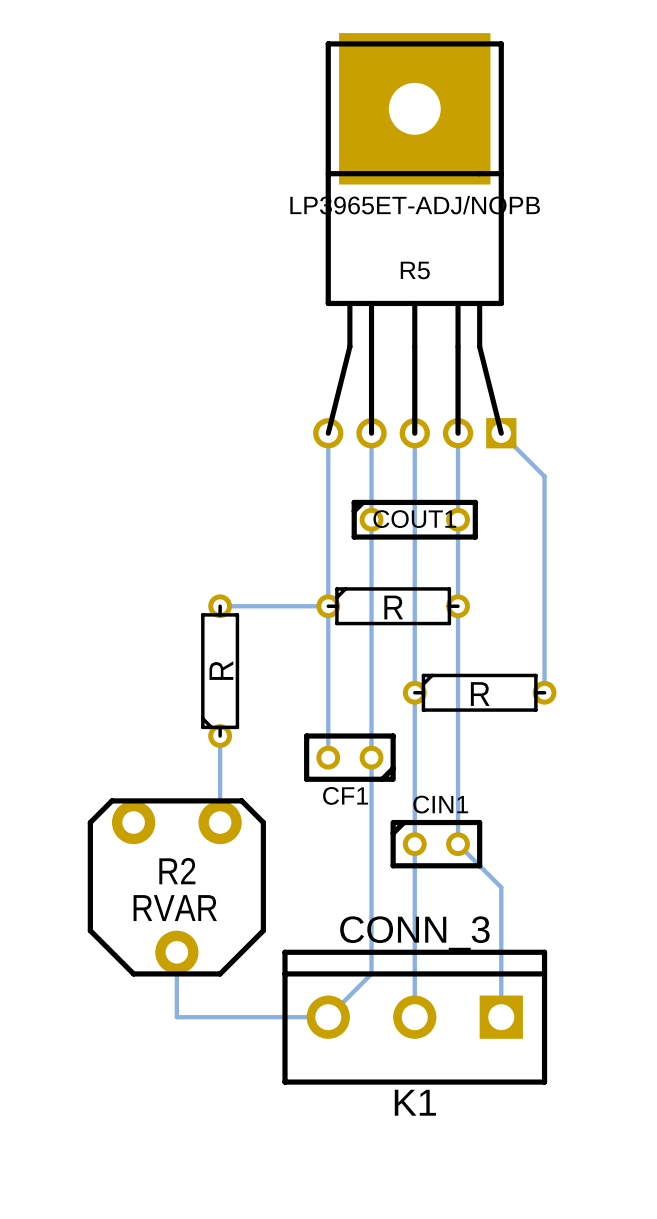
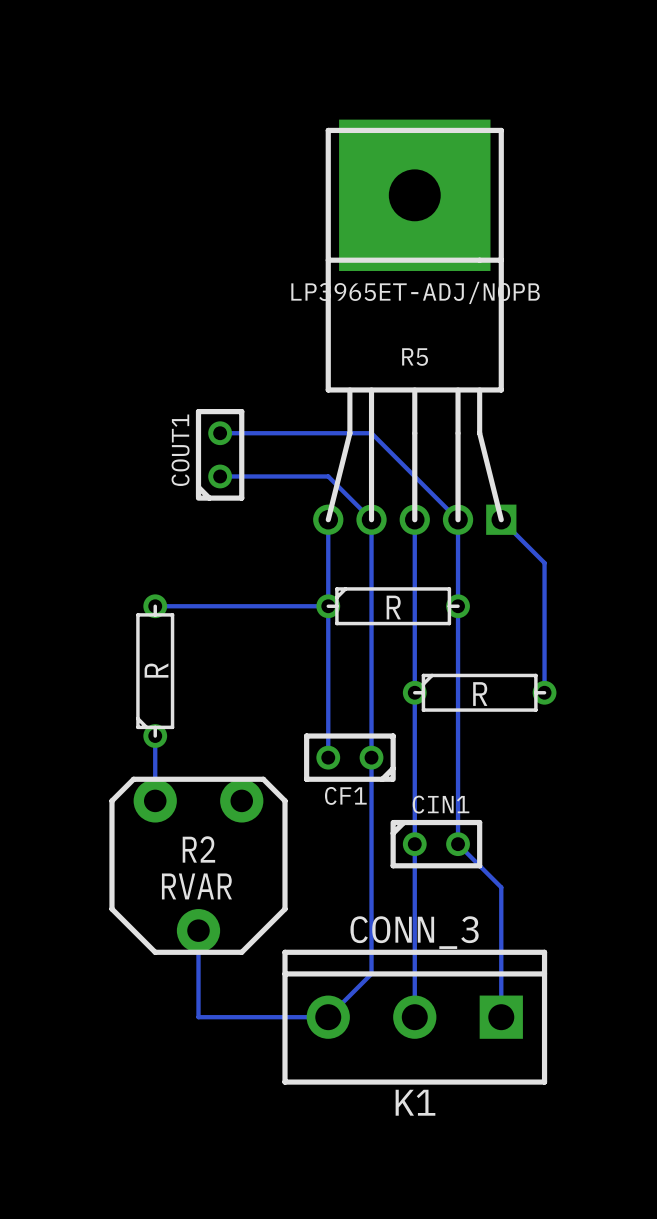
R5 position: (414, 240) -> (414, 327)
bottom track: (328, 433) (328, 519) -> none
bottom track: (371, 433) (371, 519) -> (220, 476) (328, 476) (371, 519)
bottom track: (414, 433) (414, 519) -> none
bottom track: (458, 433) (458, 519) -> (220, 433) (371, 433) (458, 519)
bottom track: (501, 433) (544, 476) (544, 562) -> (501, 519) (544, 562)
COUT1 footprint: [351, 499, 478, 540] -> [195, 409, 245, 501]
COUT1 name position: COUT1 (414, 519) -> COUT1 (180, 450)
bottom track: none -> (155, 606) (220, 606)
part position: (220, 671) -> (155, 671)
bottom track: none -> (155, 736) (155, 800)
bottom track: (220, 736) (220, 822) -> none
R2 position: (176, 887) -> (198, 865)
bottom track: (176, 952) (176, 1017) (198, 1017) -> (198, 930) (198, 1017)

